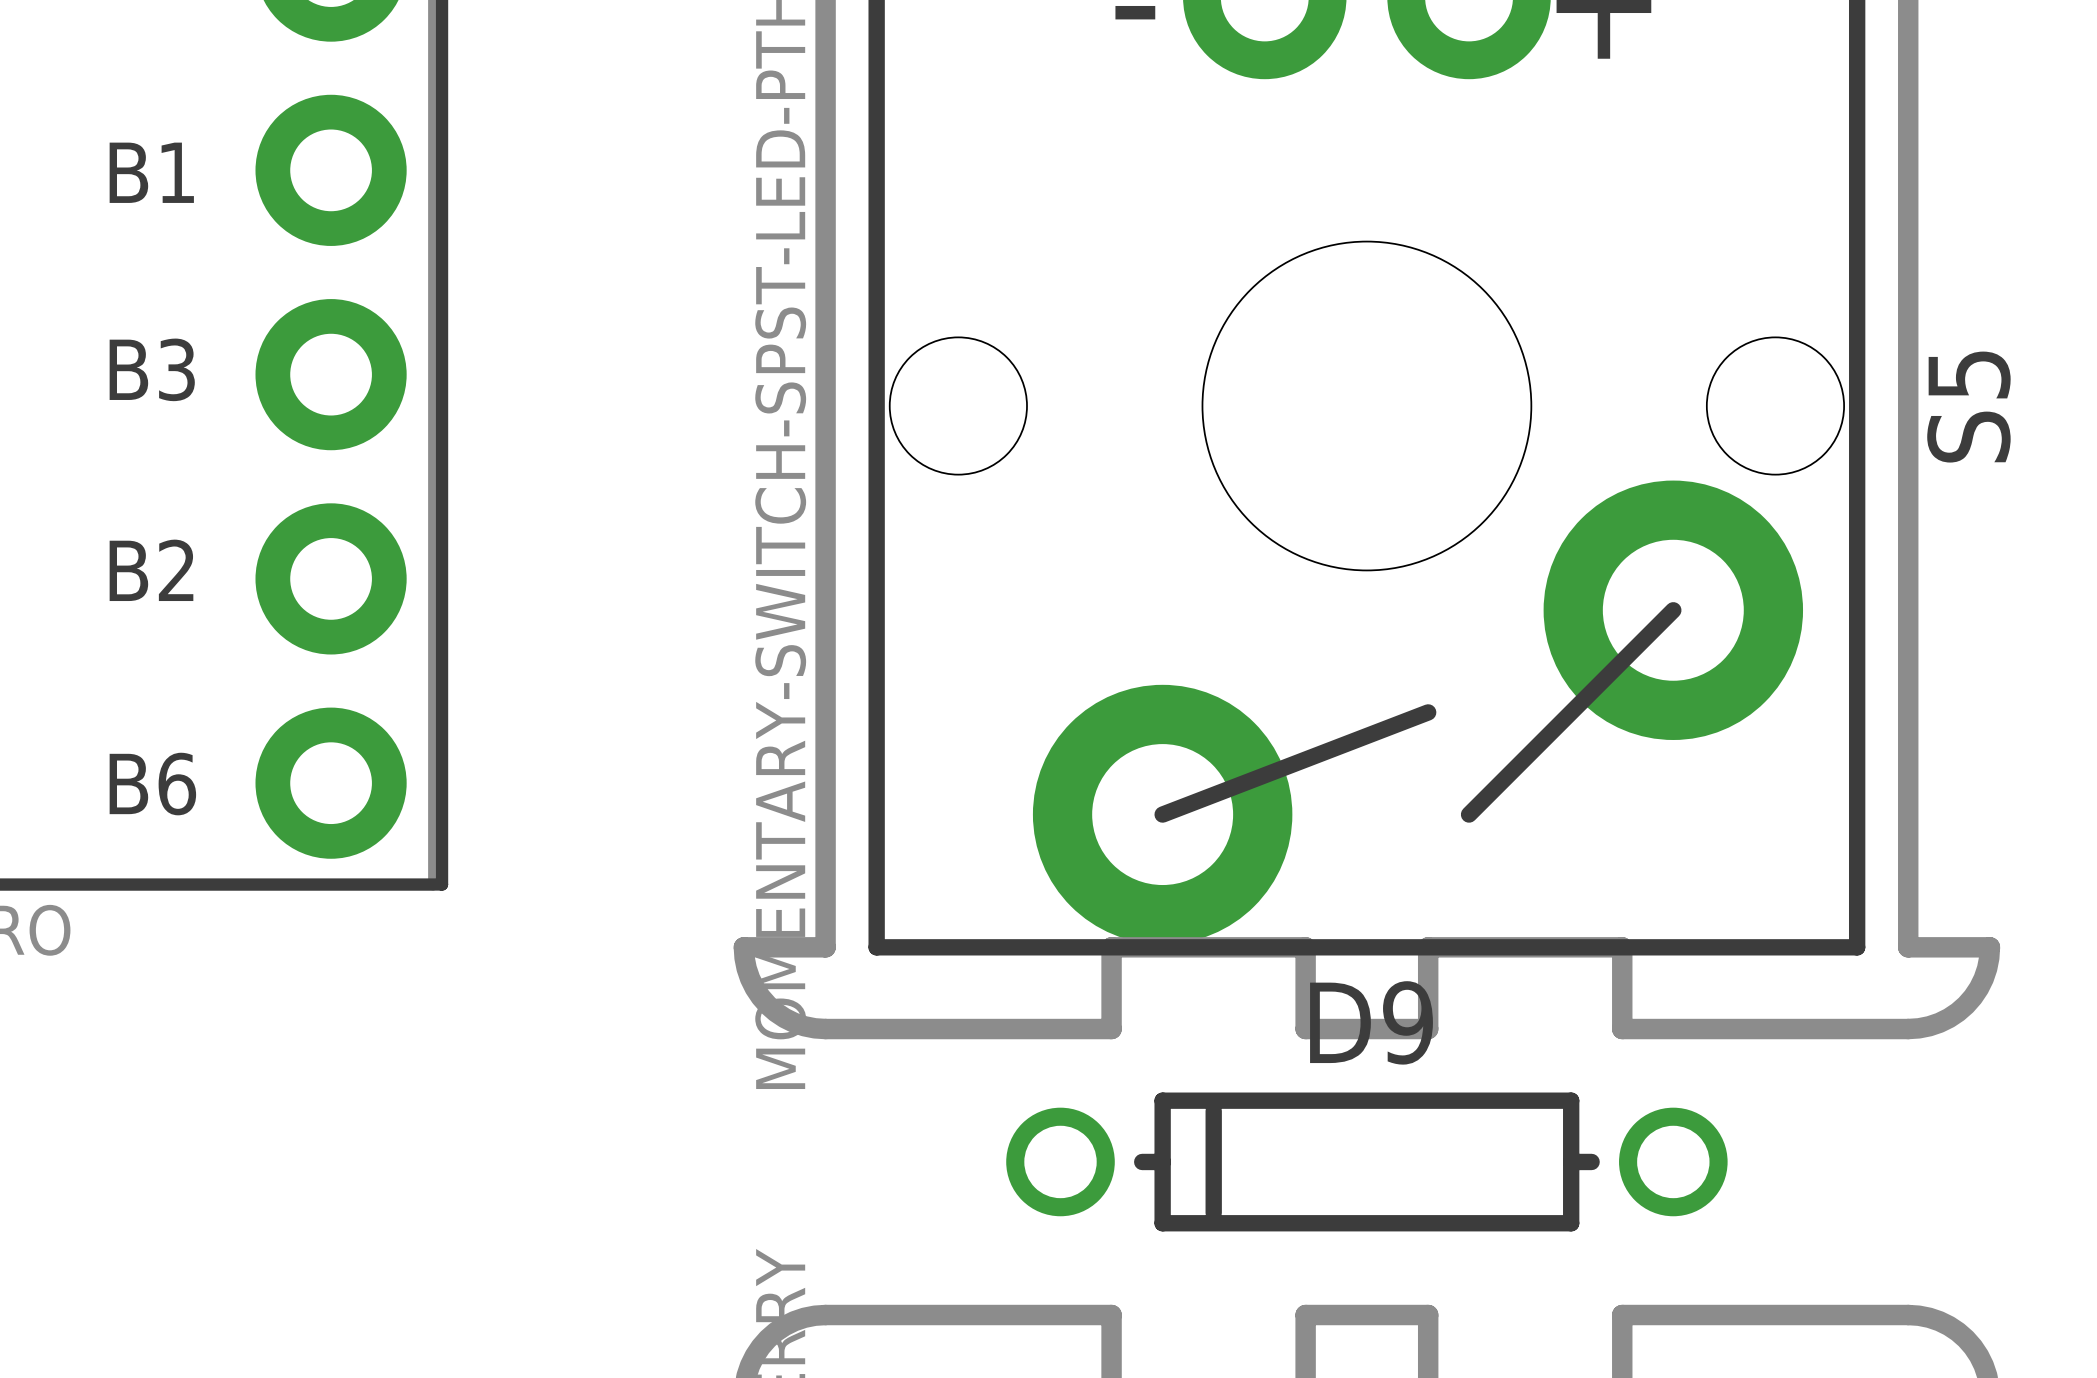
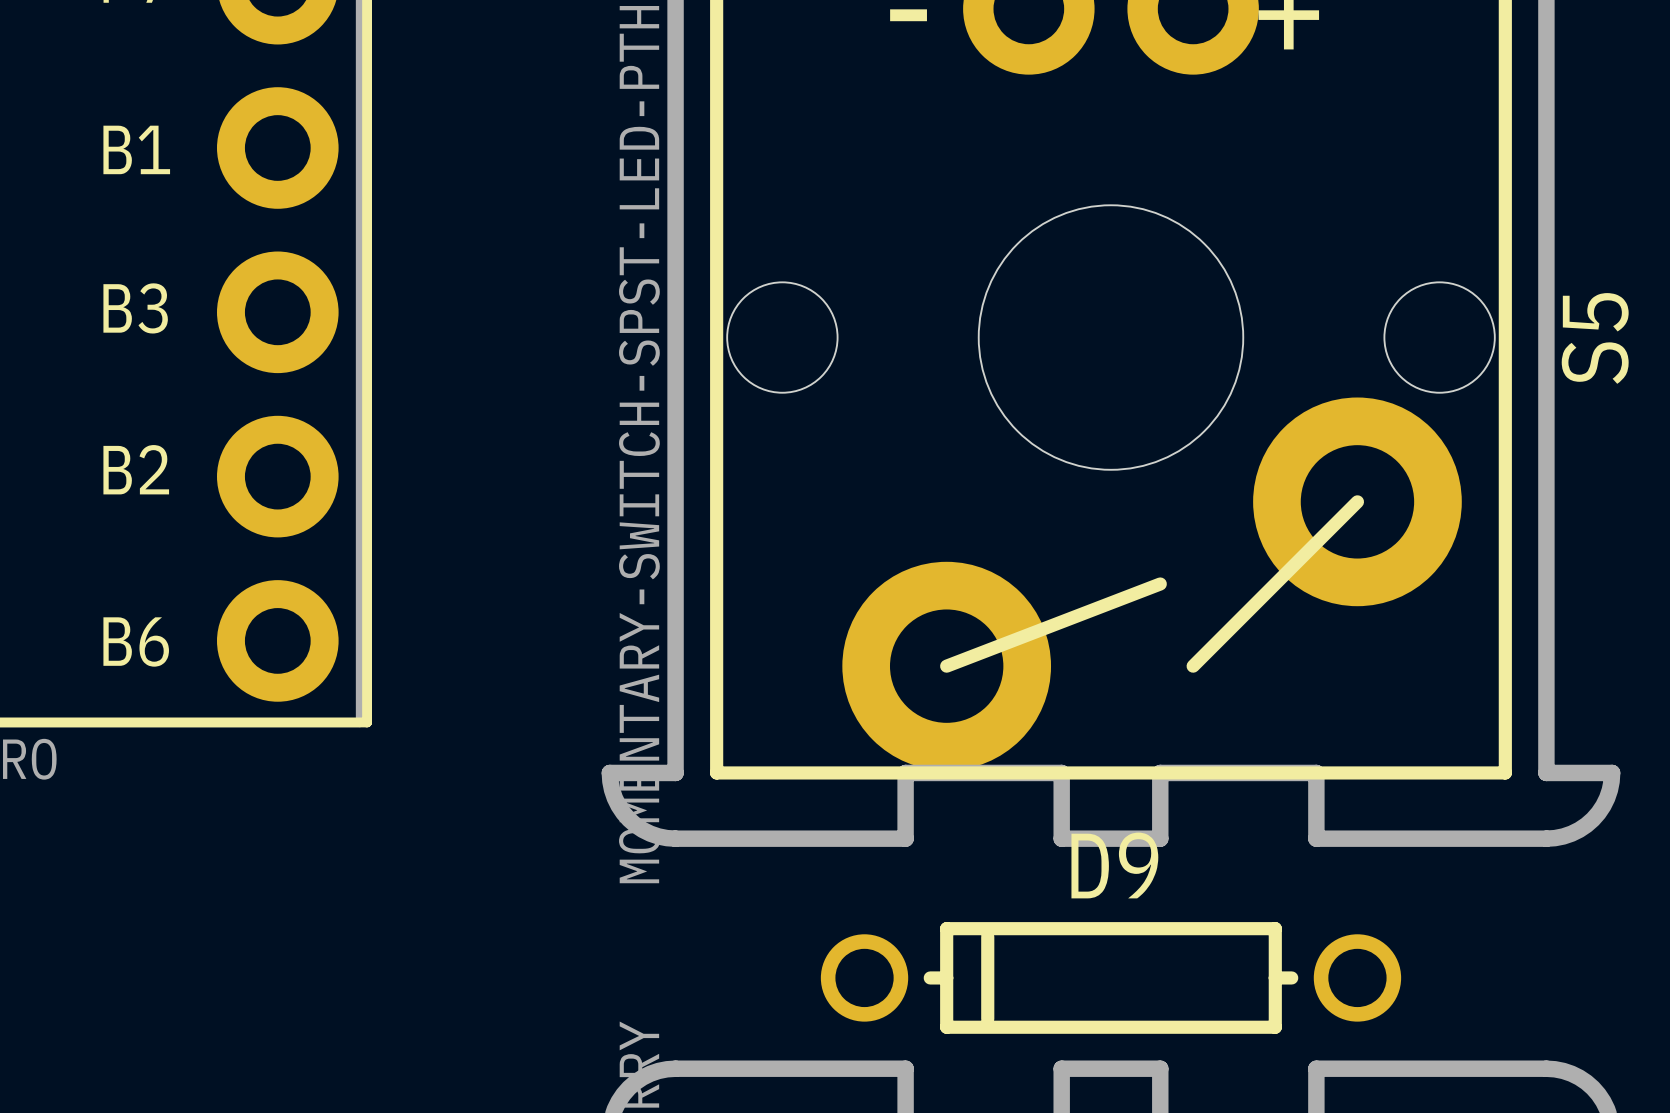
D9 position: (1366, 1161) -> (1110, 977)

